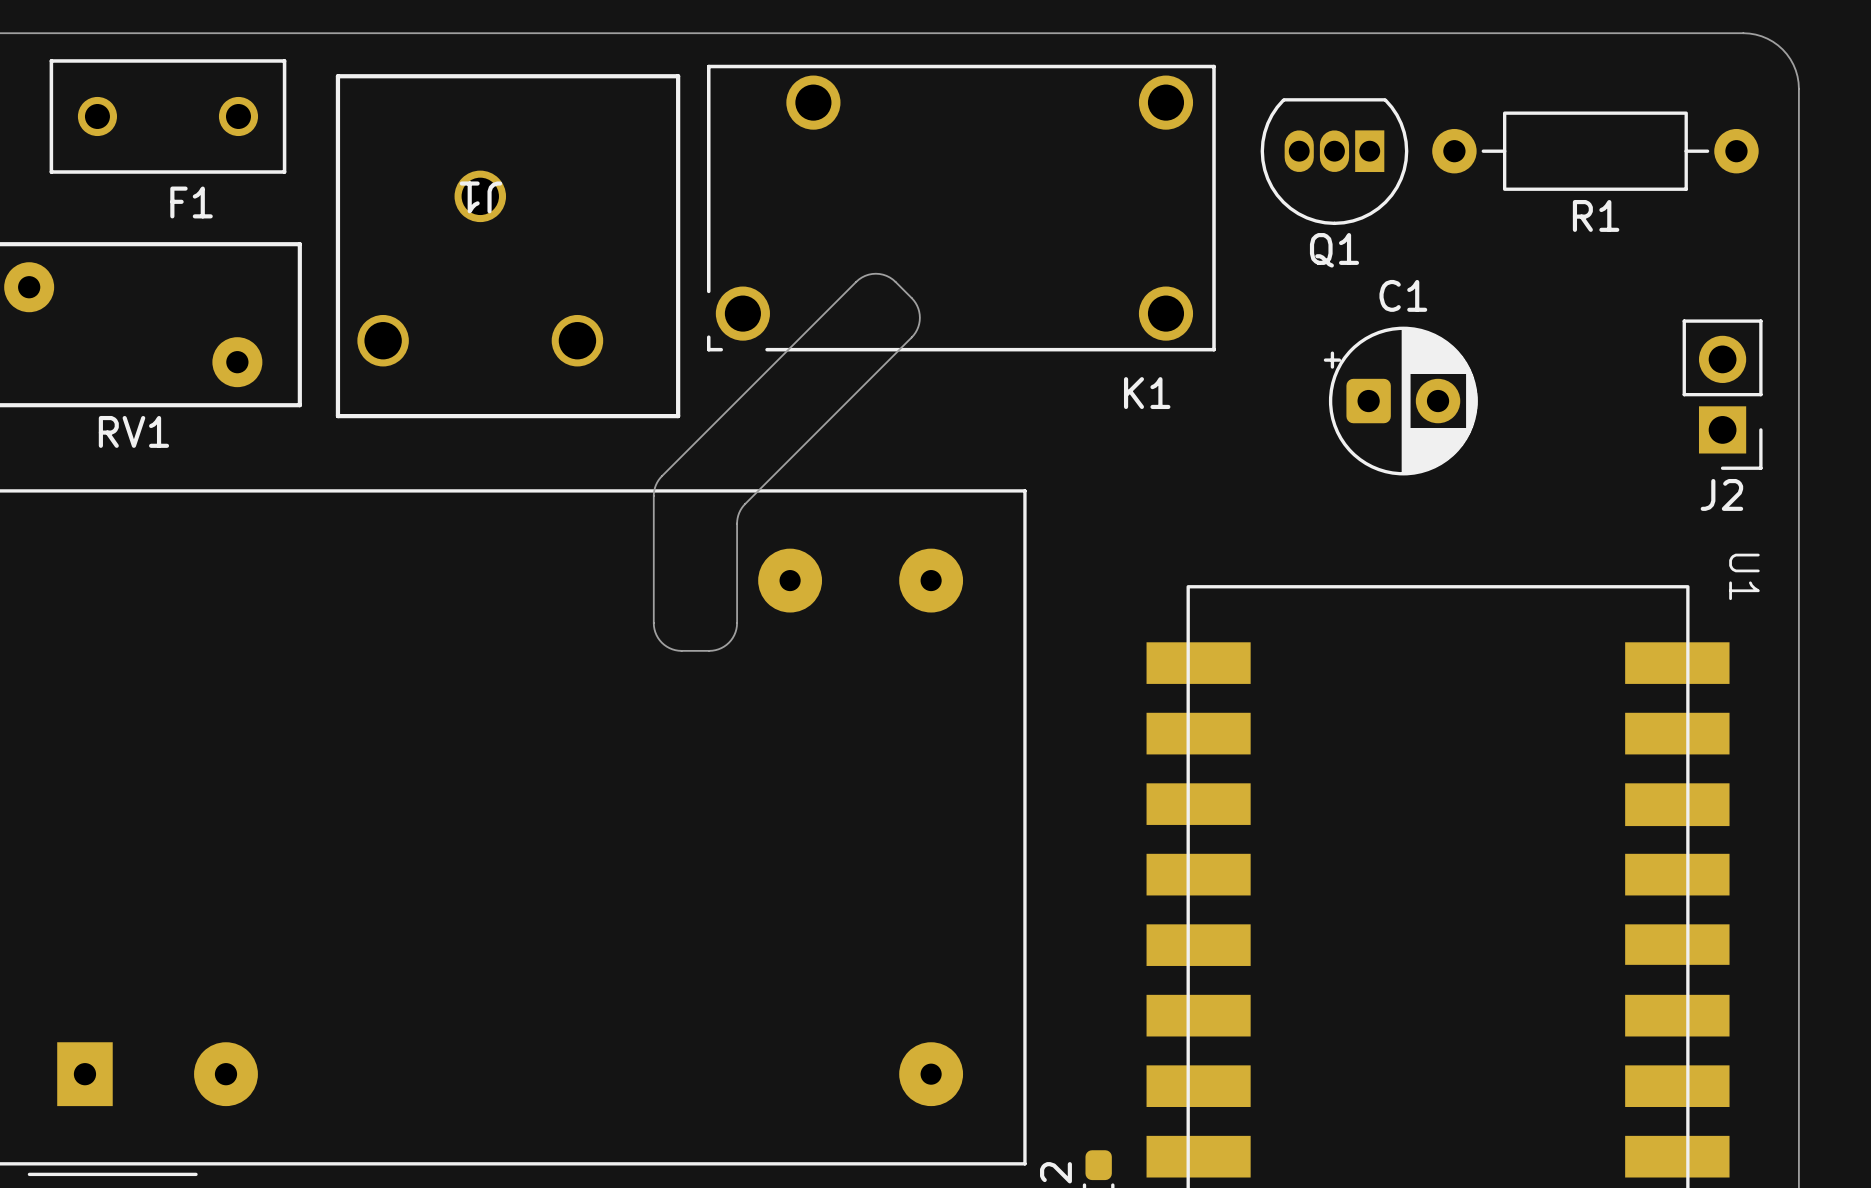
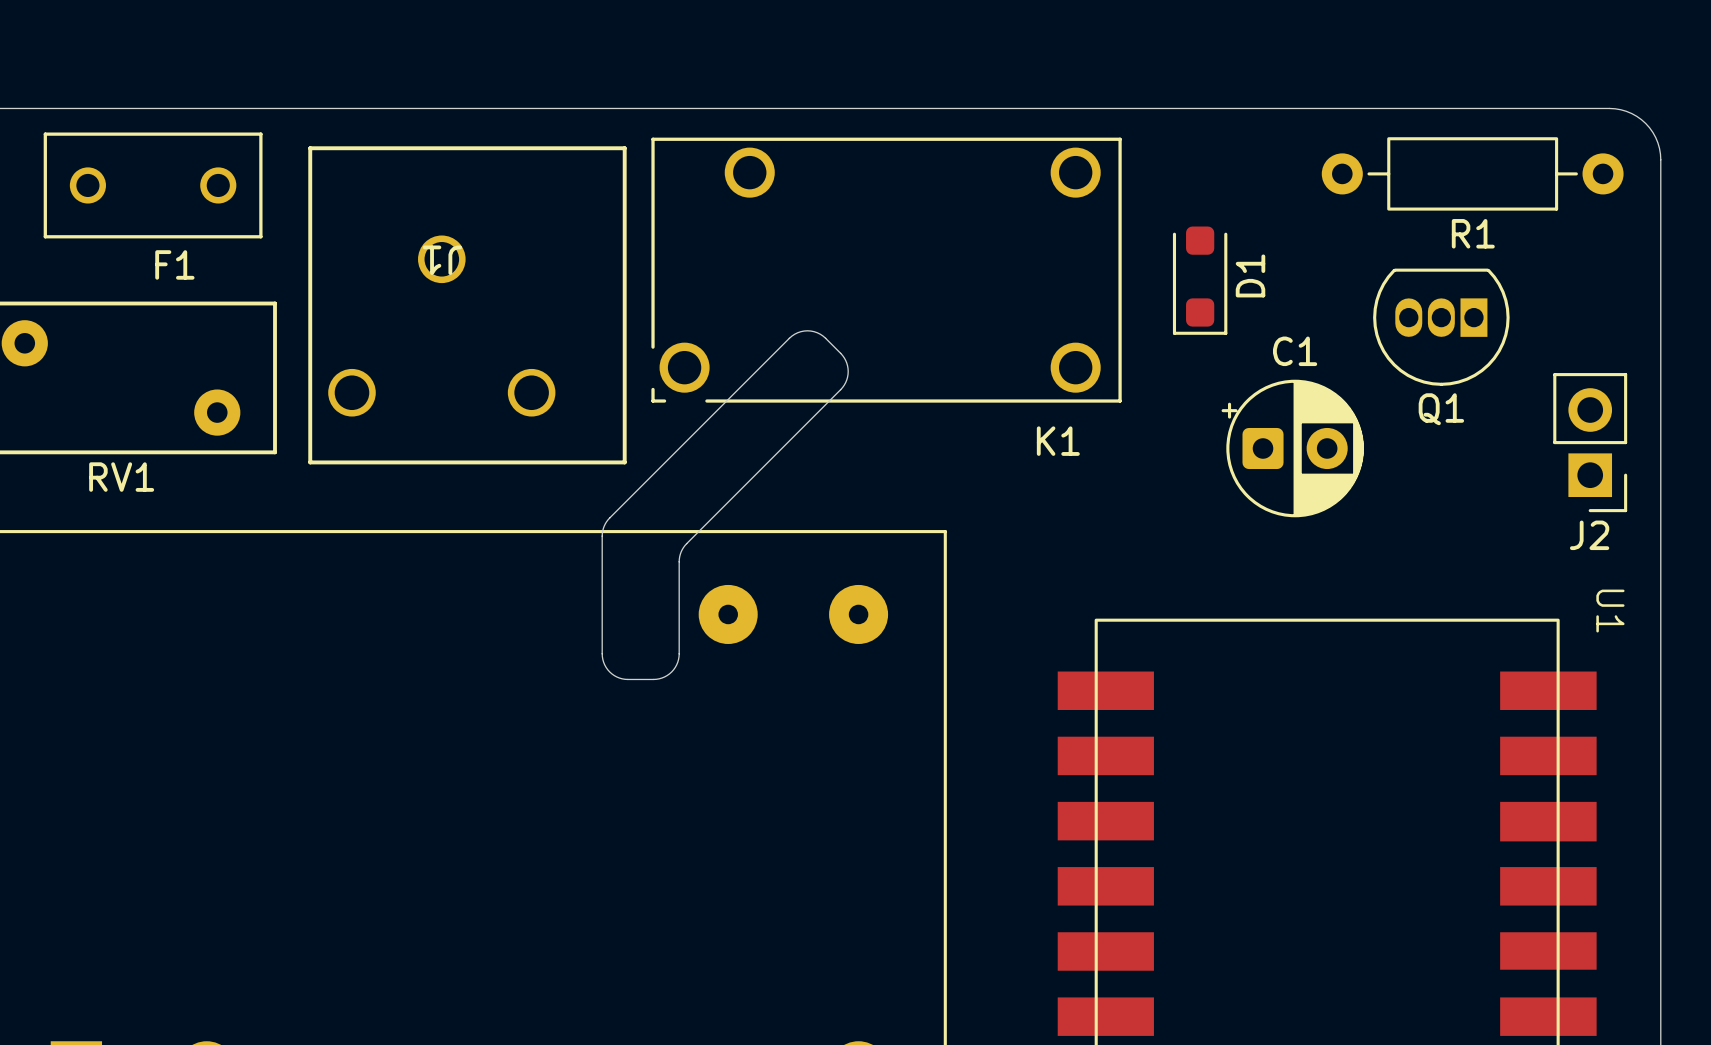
R1 position: (1595, 151) -> (1472, 173)
Q1 position: (1334, 161) -> (1441, 327)
D1: none -> (1200, 280)

